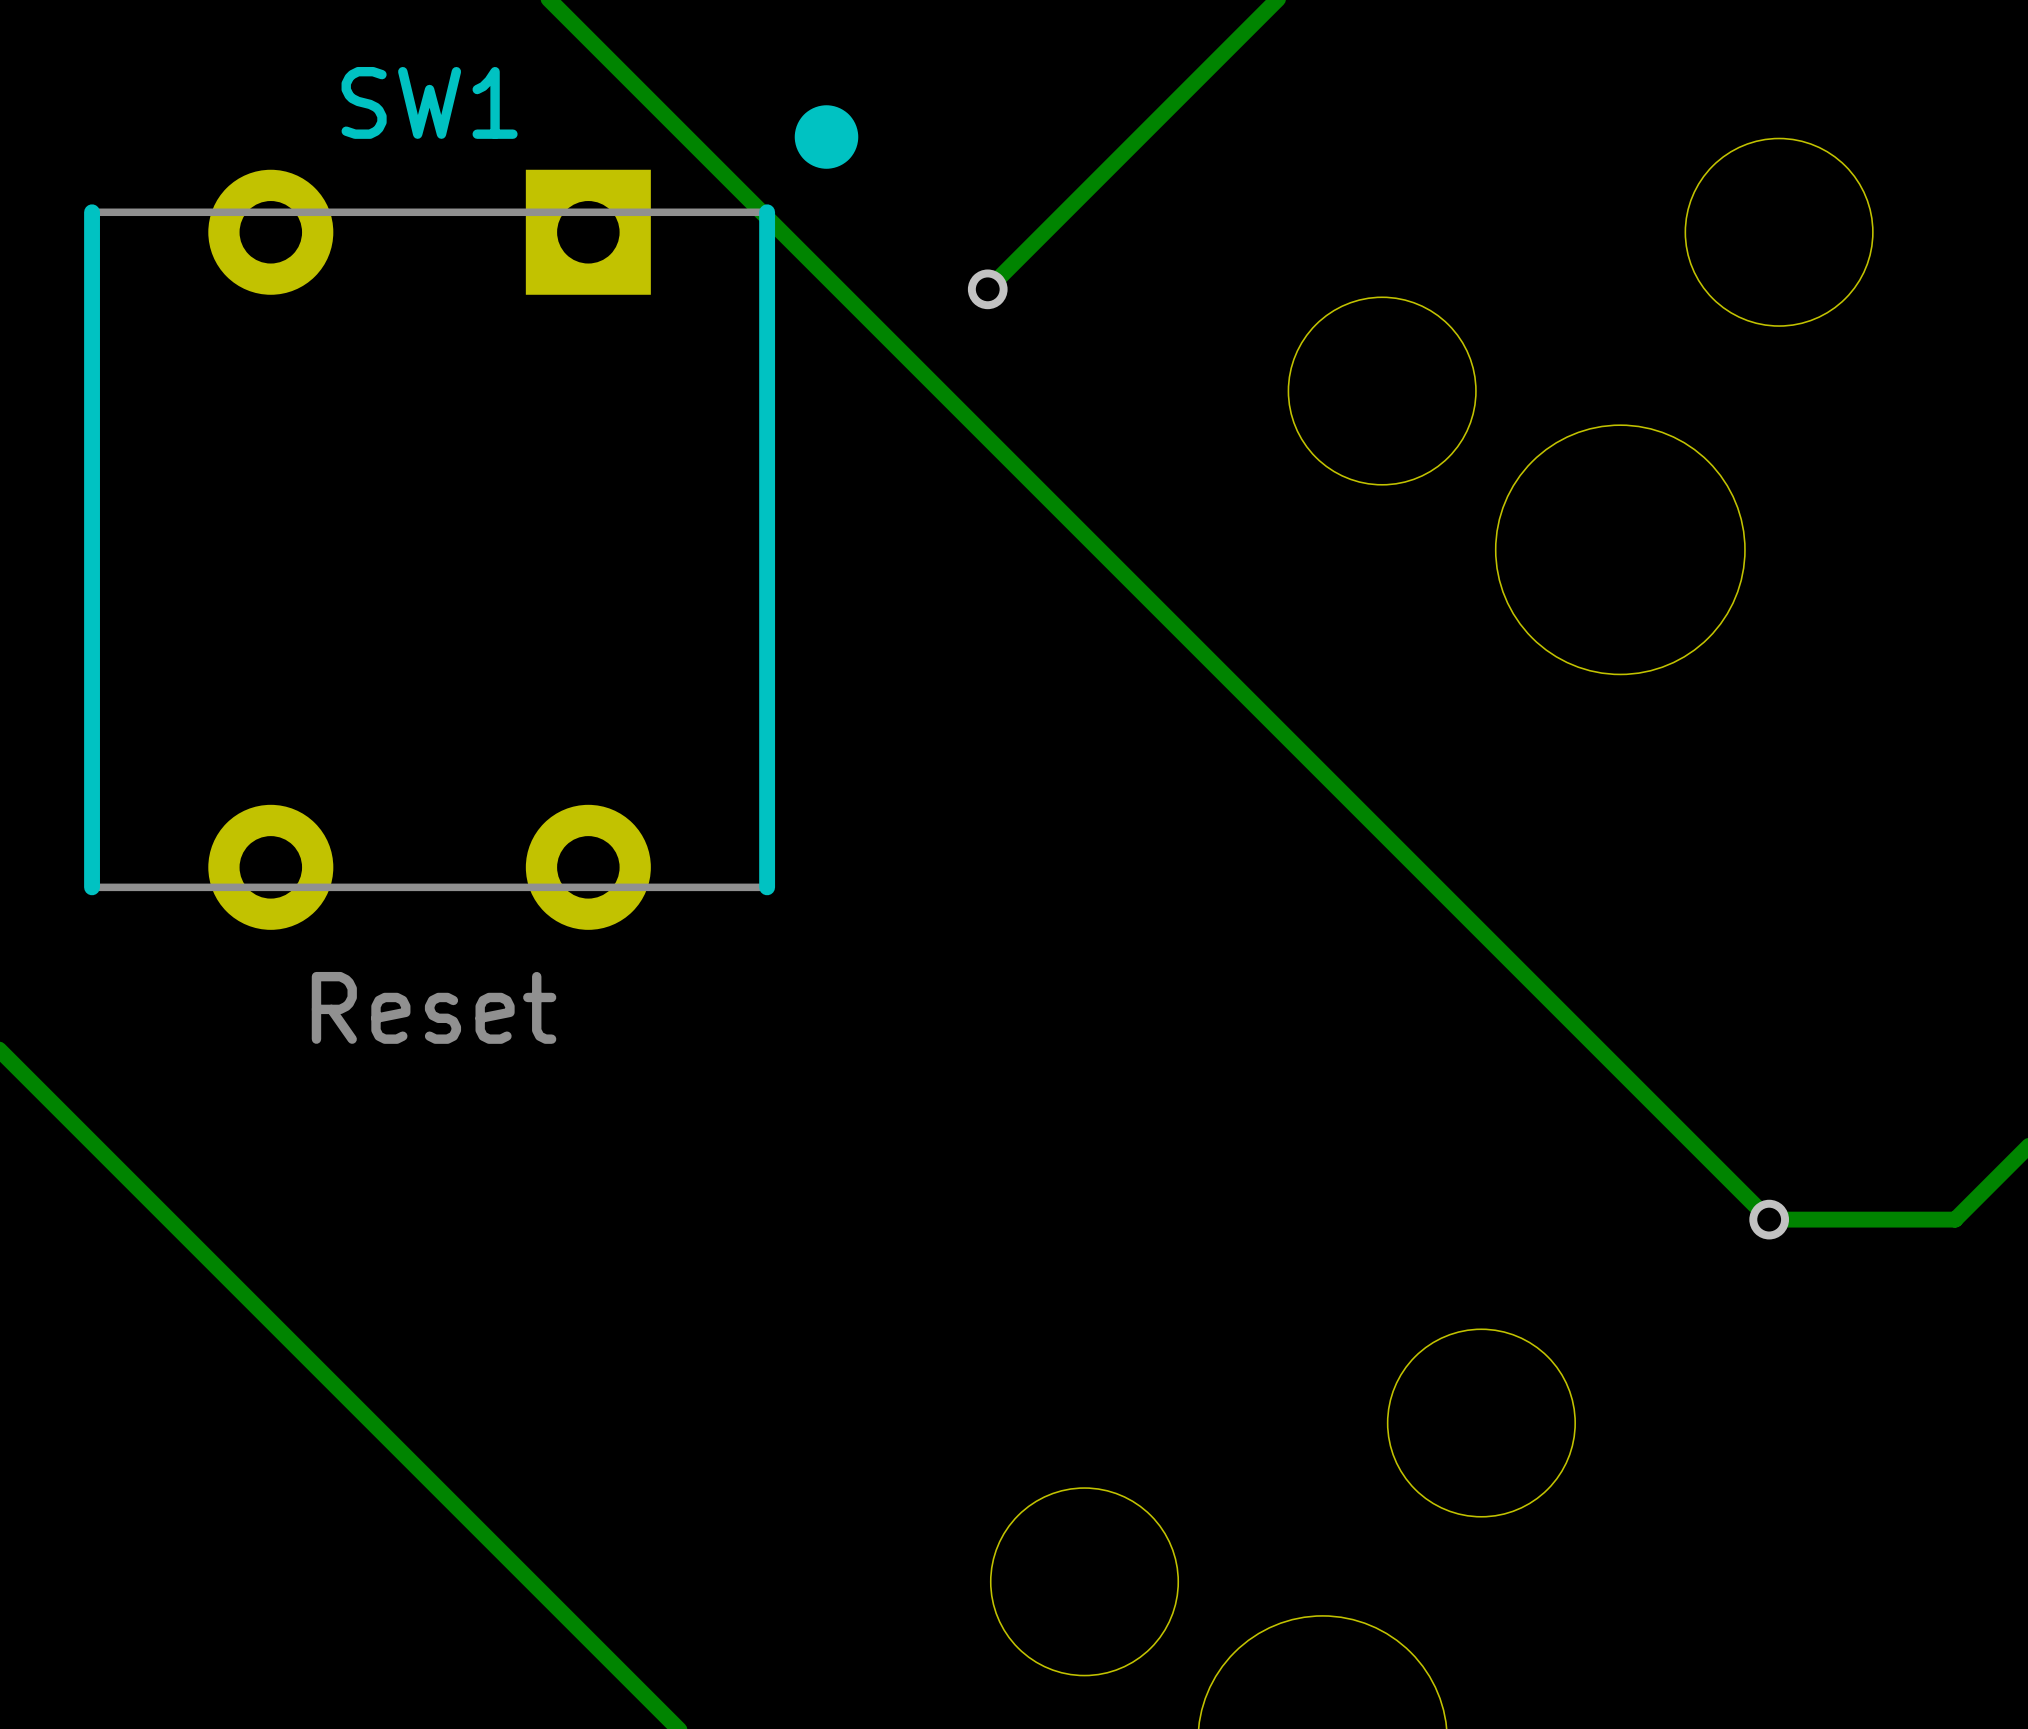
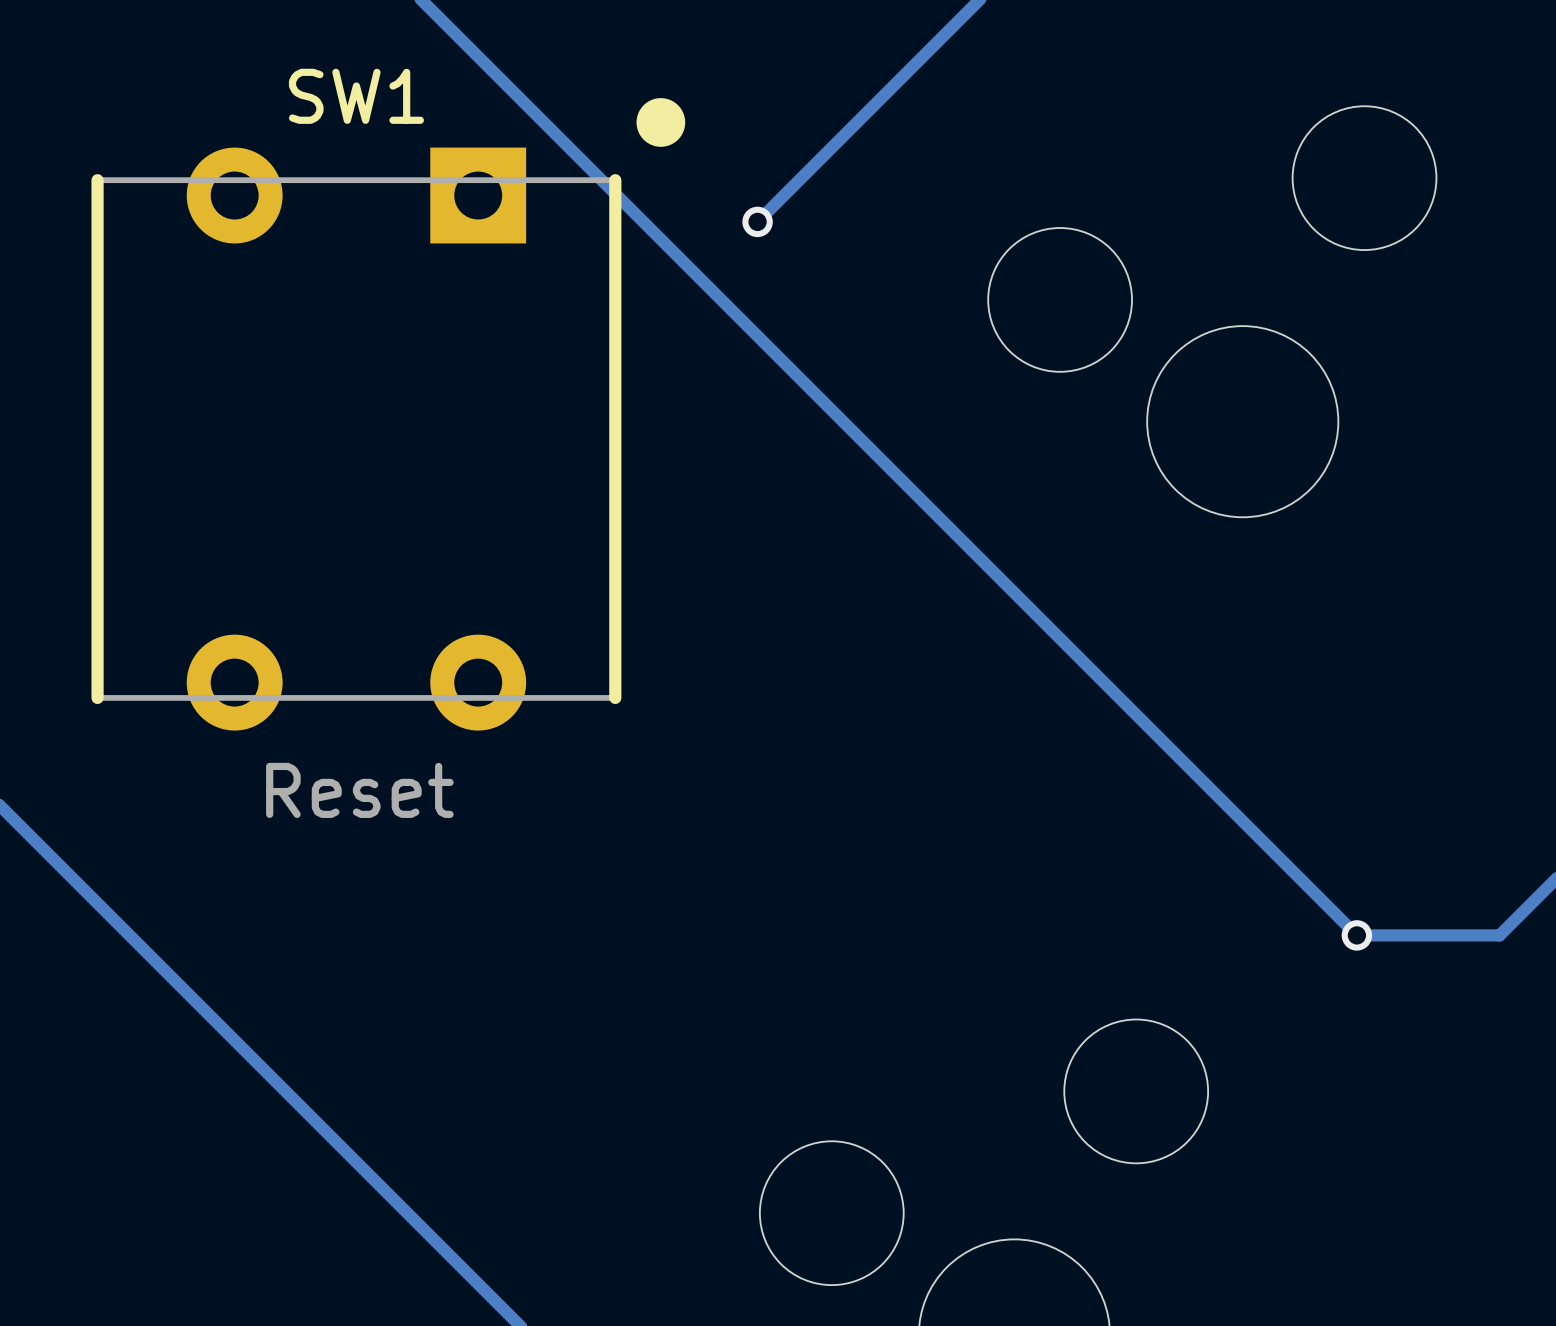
SW1 position: (471, 517) -> (388, 414)

